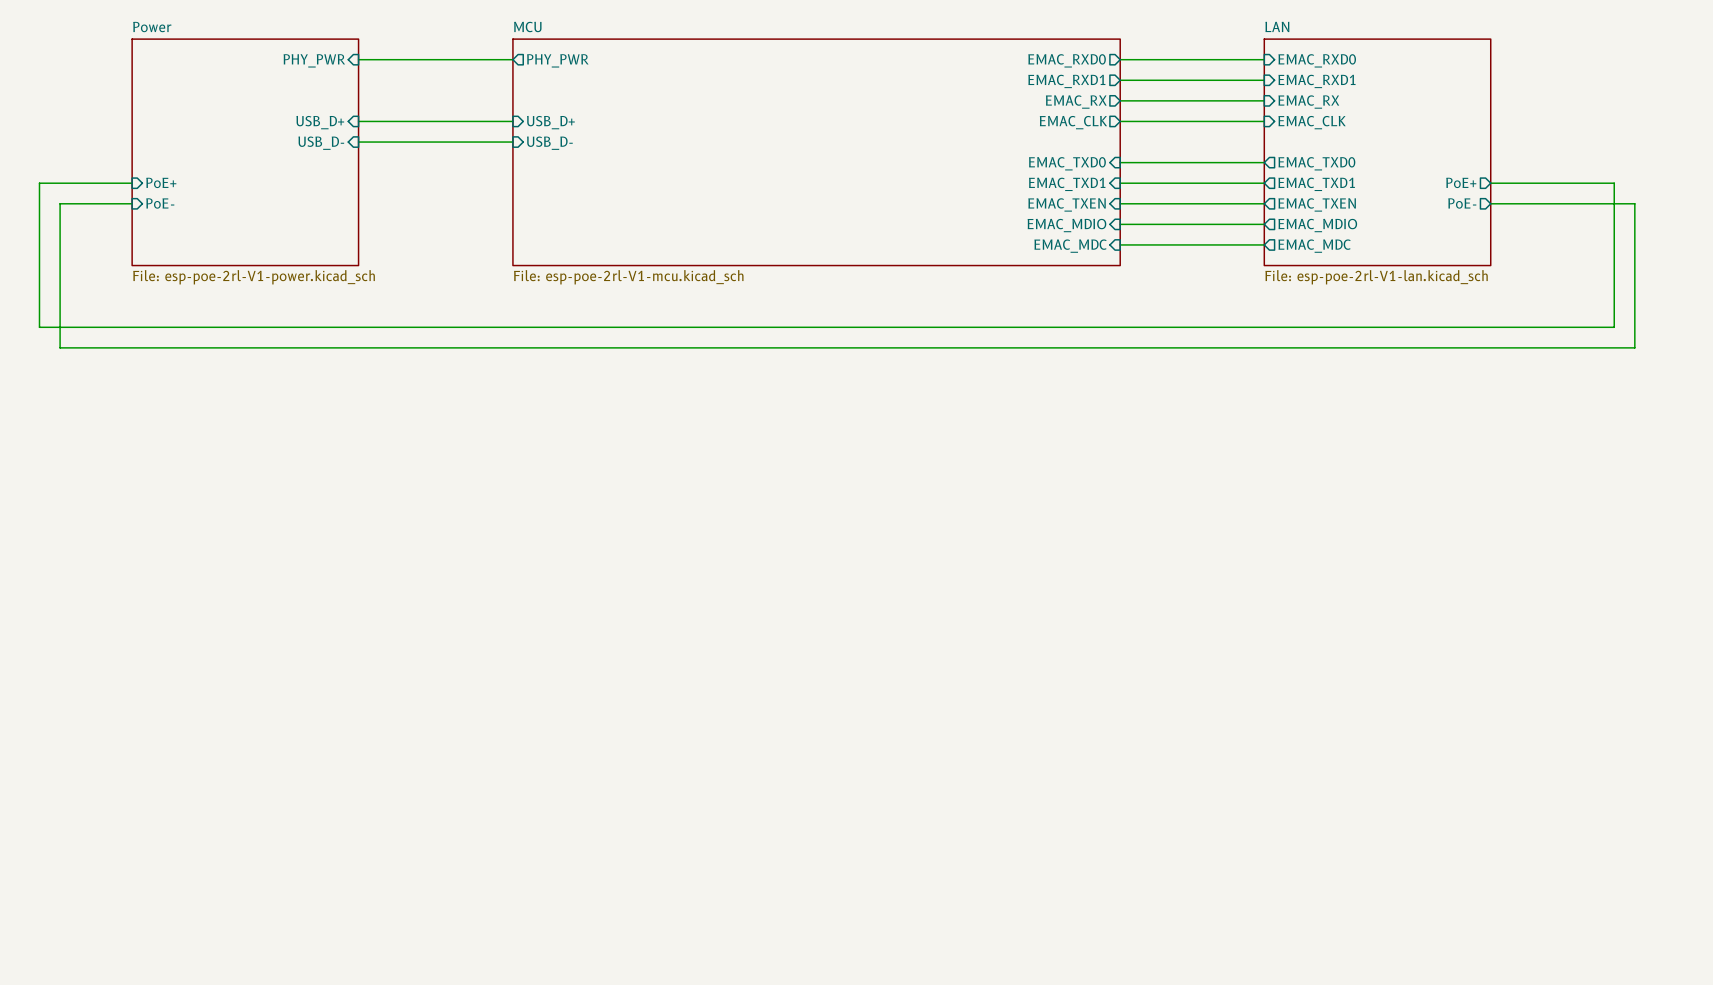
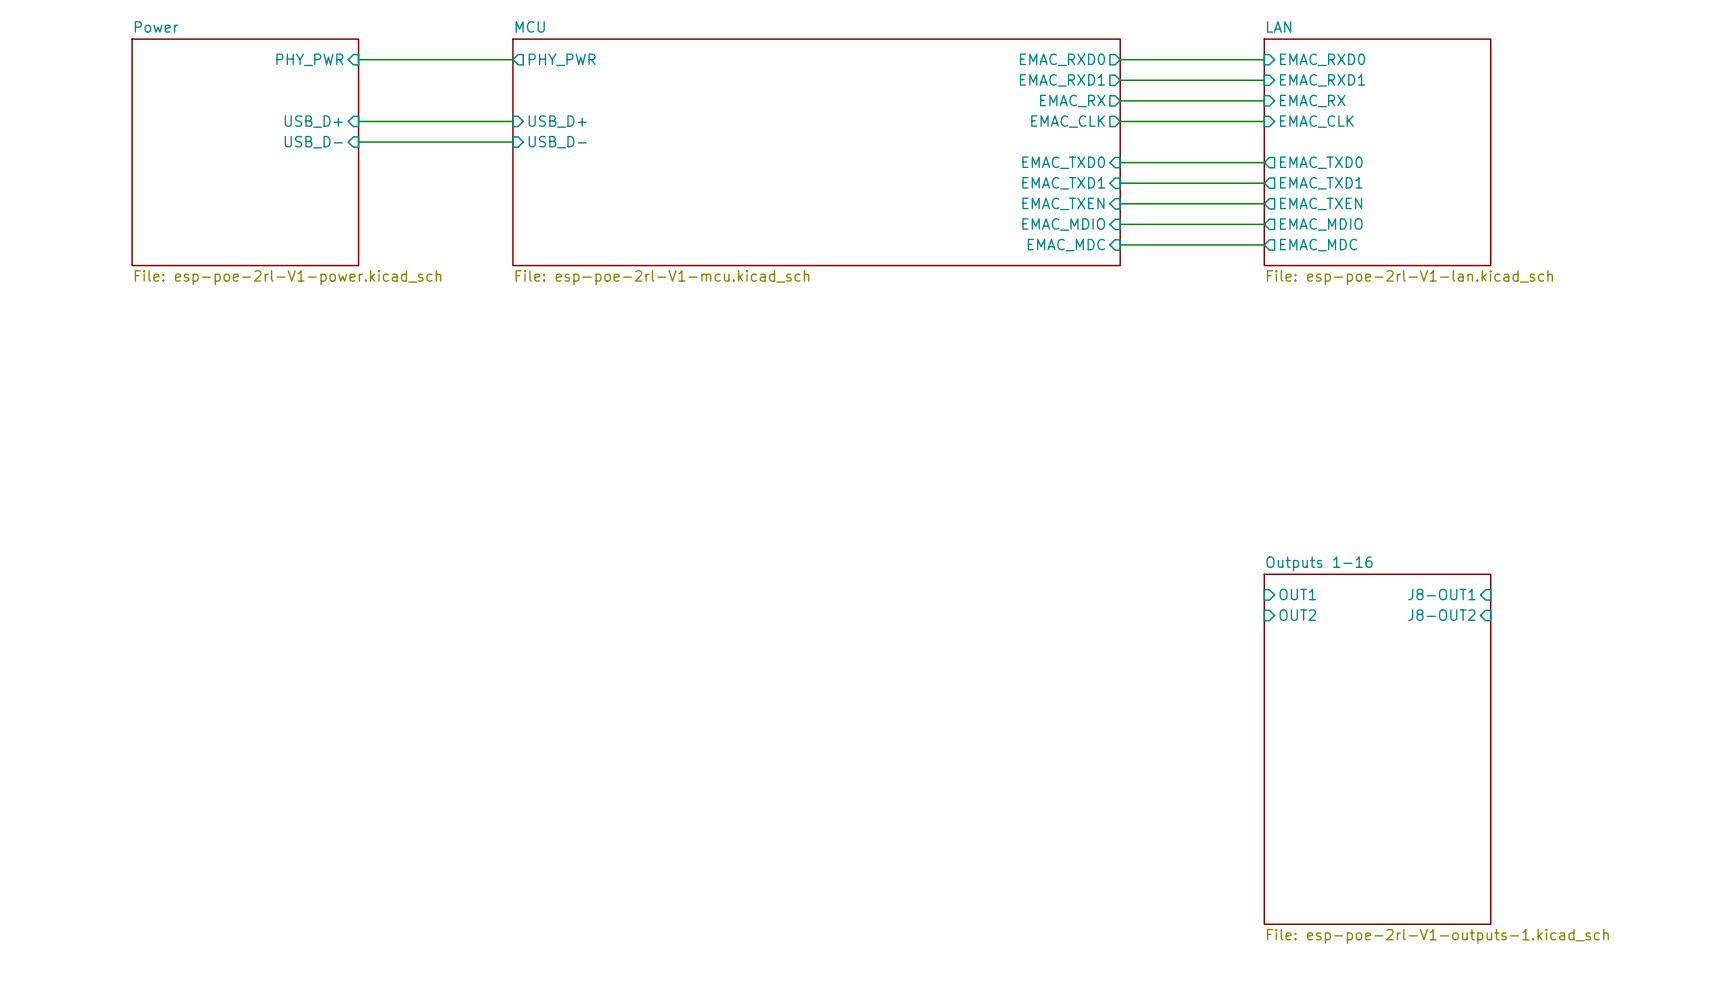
sheet pin: PoE+ (161, 182) -> none
sheet pin: PoE+ (1461, 182) -> none
wire: (132, 183) (39, 183) (39, 327) (1614, 327) (1614, 183) (1490, 183) -> none
wire: (132, 203) (60, 203) (60, 347) (1634, 347) (1634, 203) (1490, 203) -> none
sheet pin: PoE- (160, 203) -> none
sheet pin: PoE- (1462, 203) -> none
sheet pin: none -> OUT1 (1297, 594)
sheet pin: none -> J8-OUT1 (1441, 594)
sheet pin: none -> OUT2 (1297, 615)
sheet pin: none -> J8-OUT2 (1441, 615)
sheet Outputs 1-16: none -> File: esp-poe-2rl-V1-outputs-1.kicad_sch (1377, 749)

